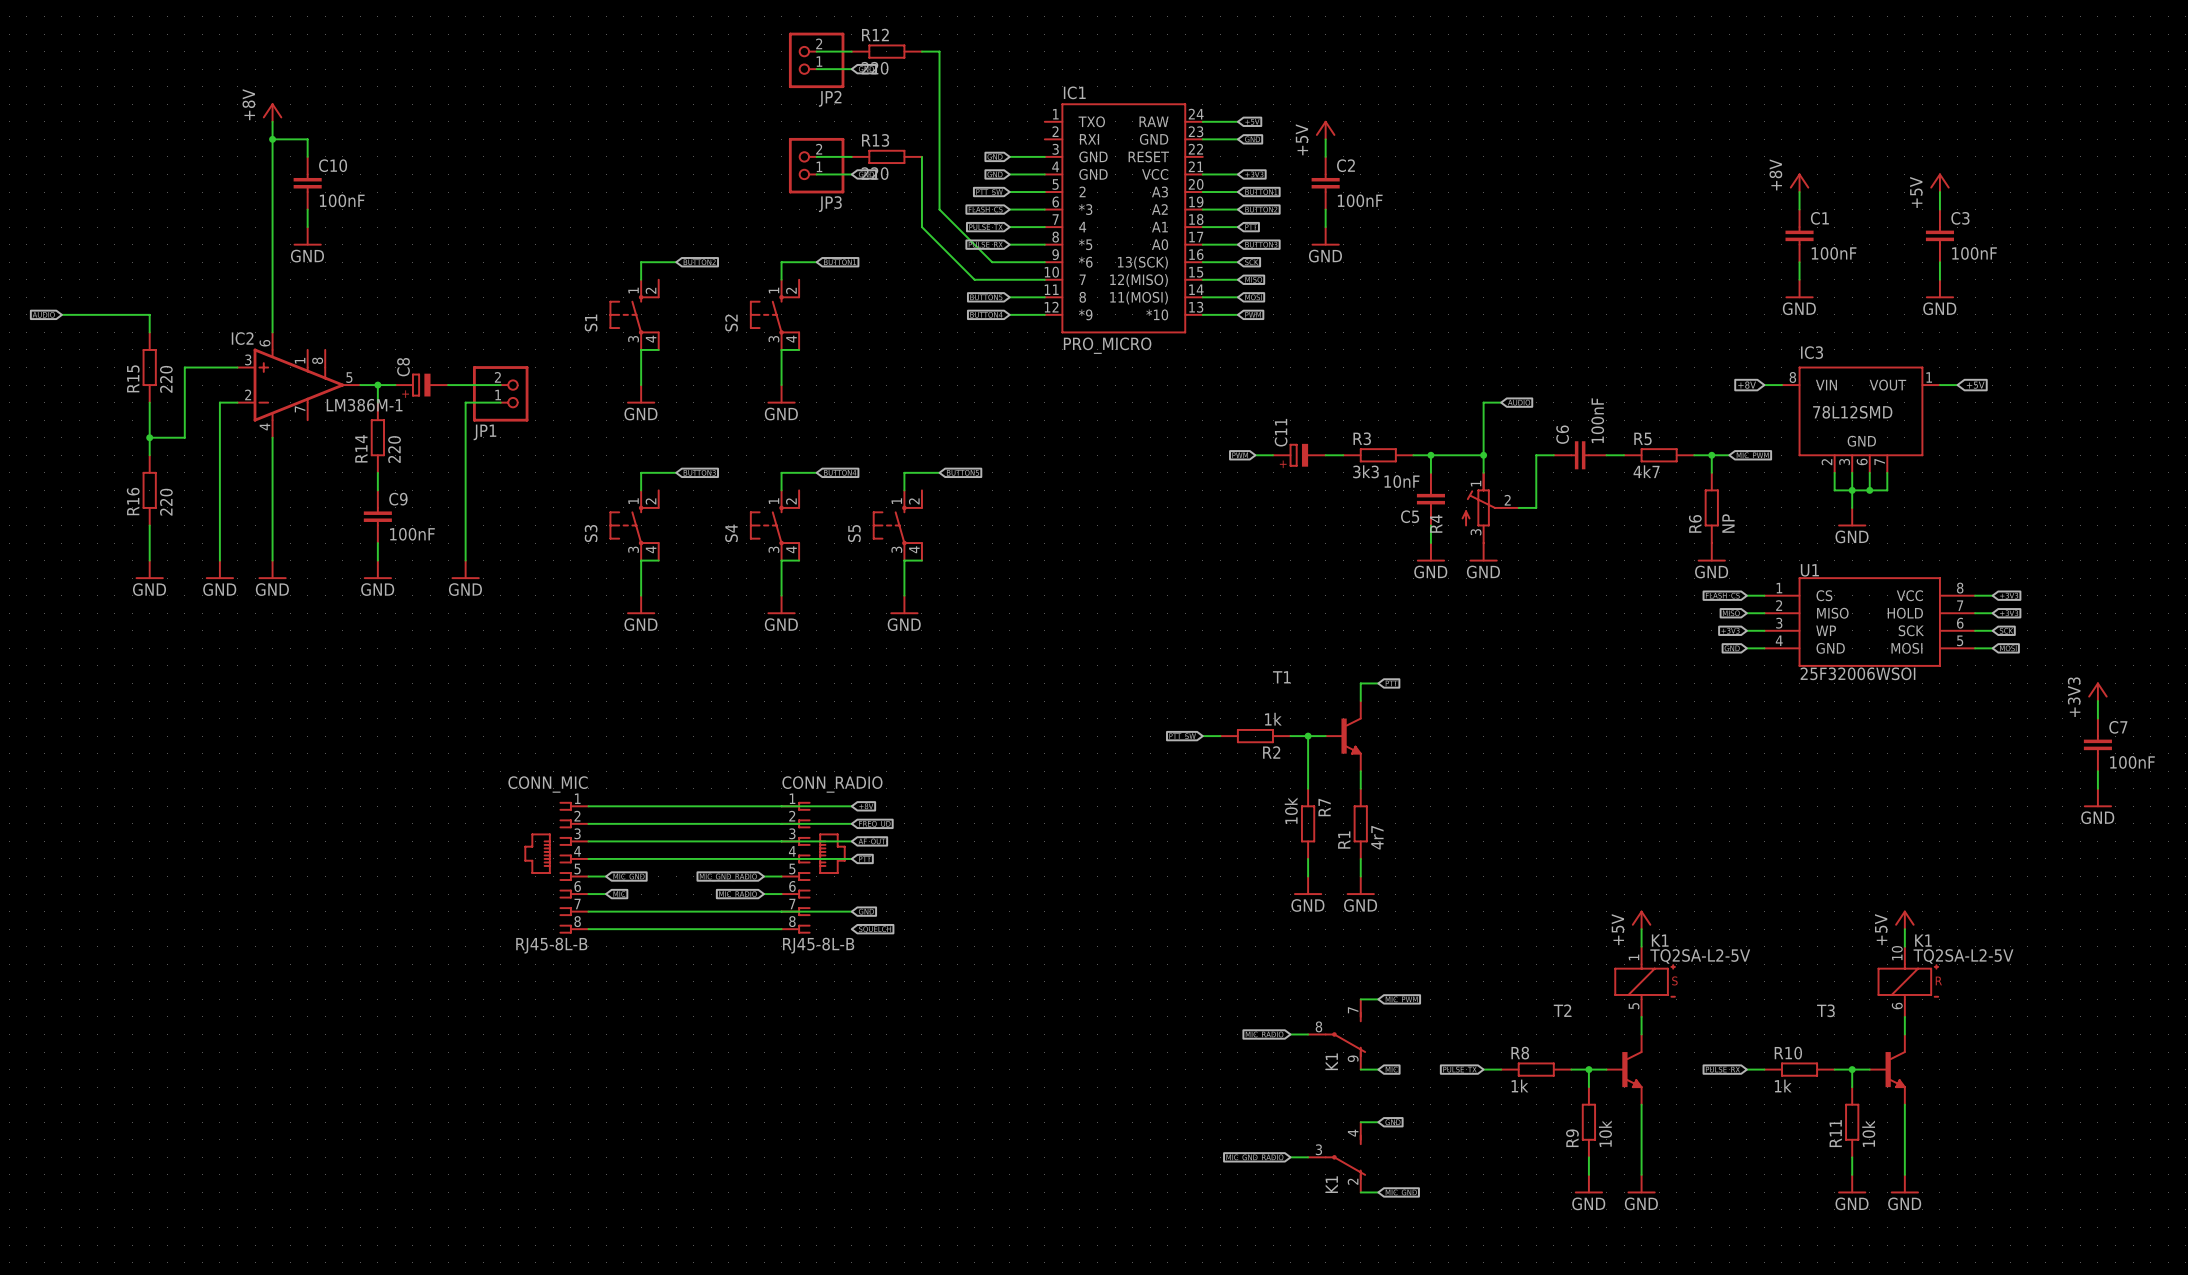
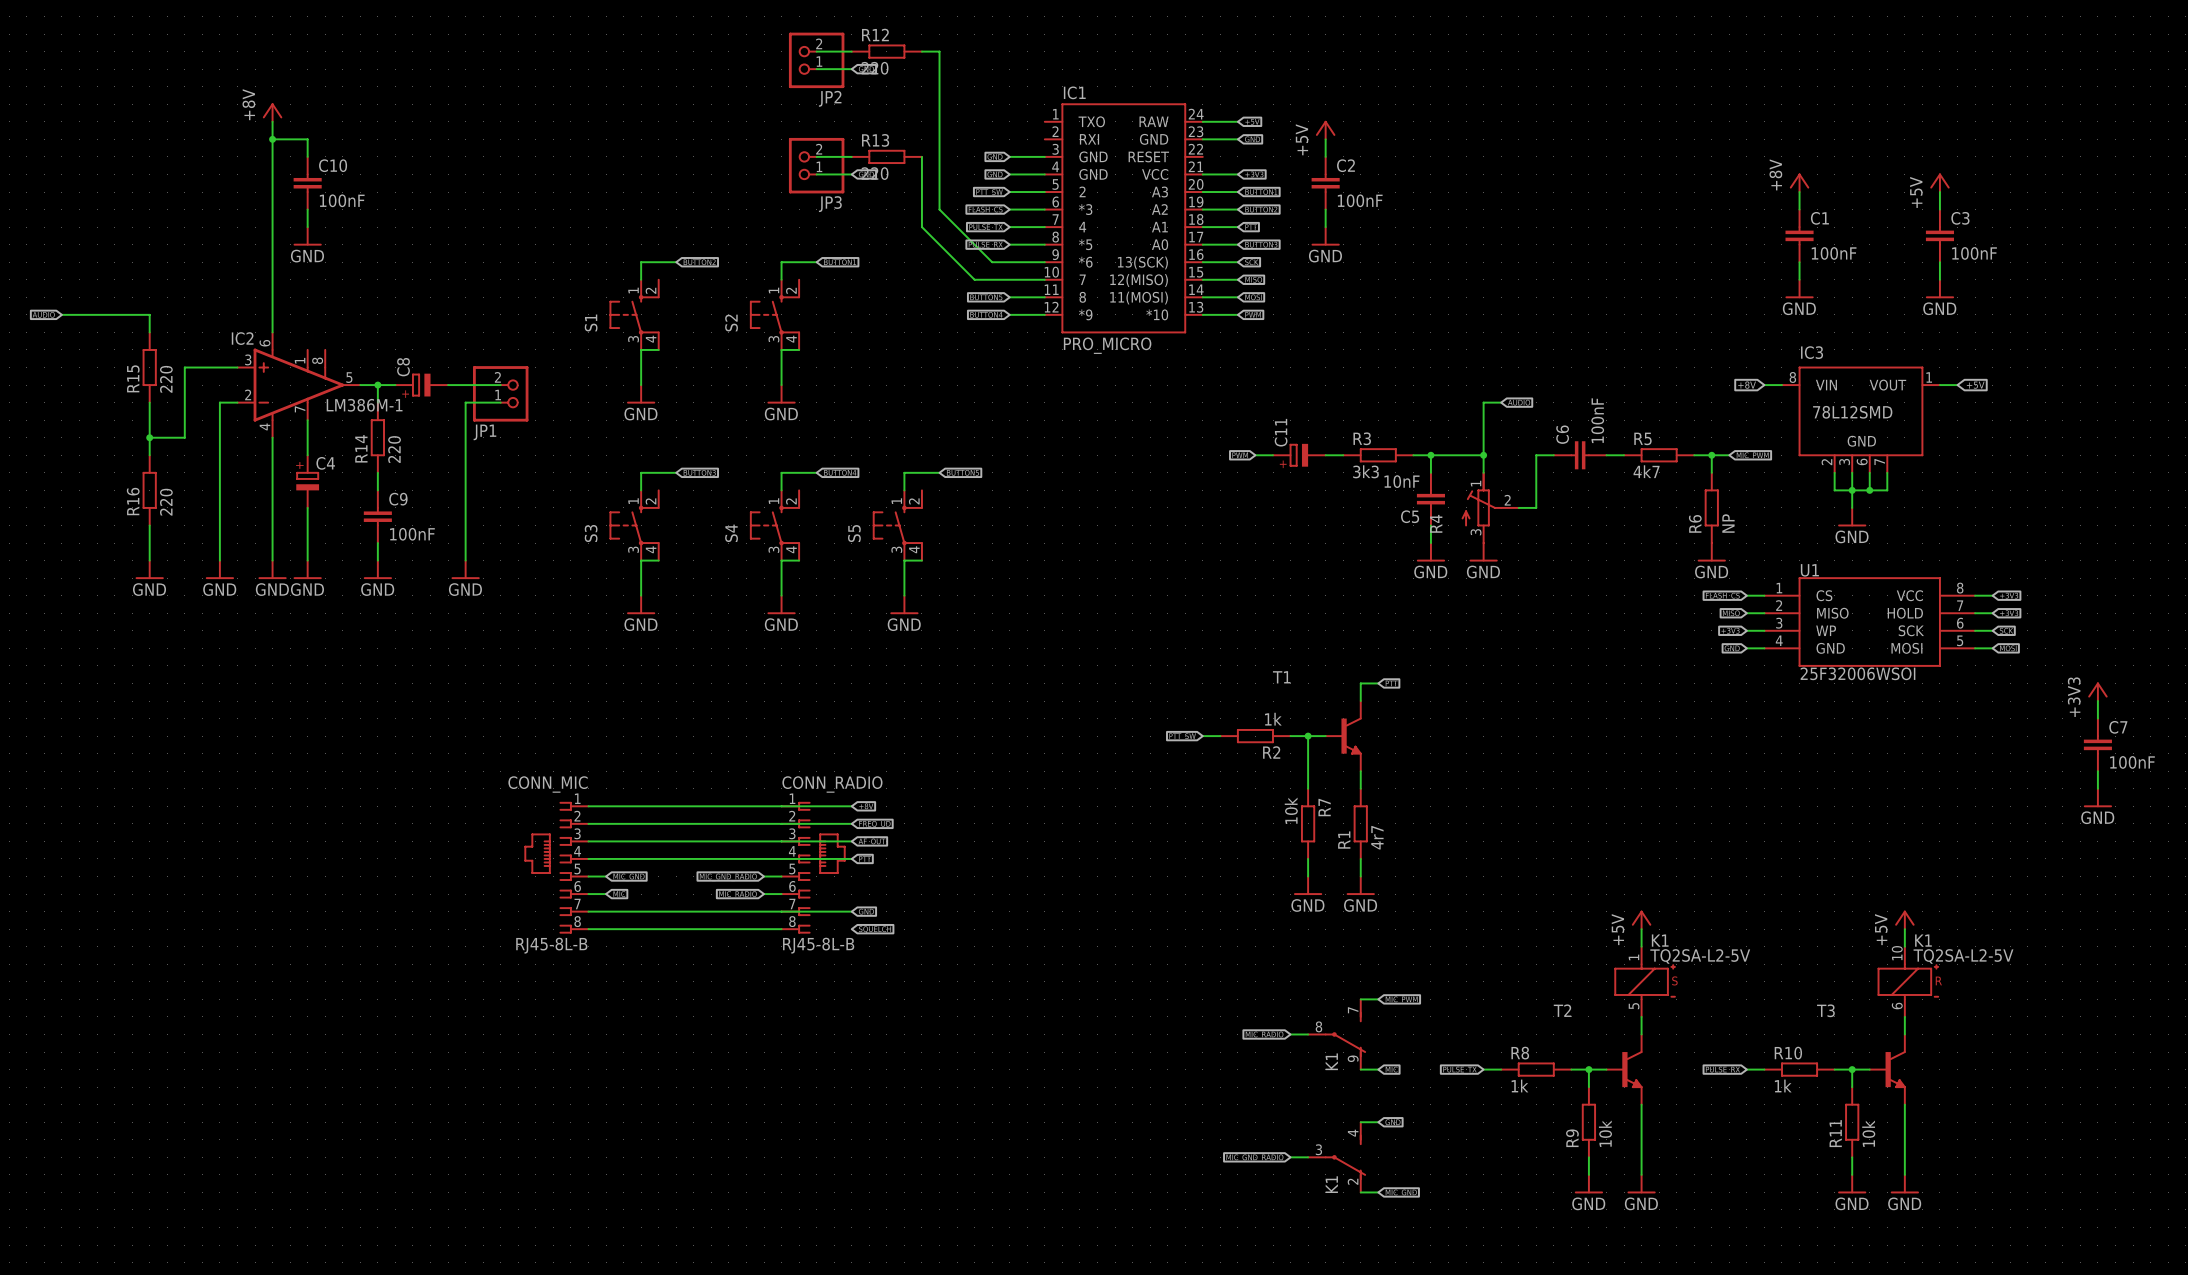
wire: none -> (307, 420) (307, 455)
C4: none -> (307, 481)
wire: none -> (307, 507) (307, 560)
power symbol: none -> GND (307, 569)

